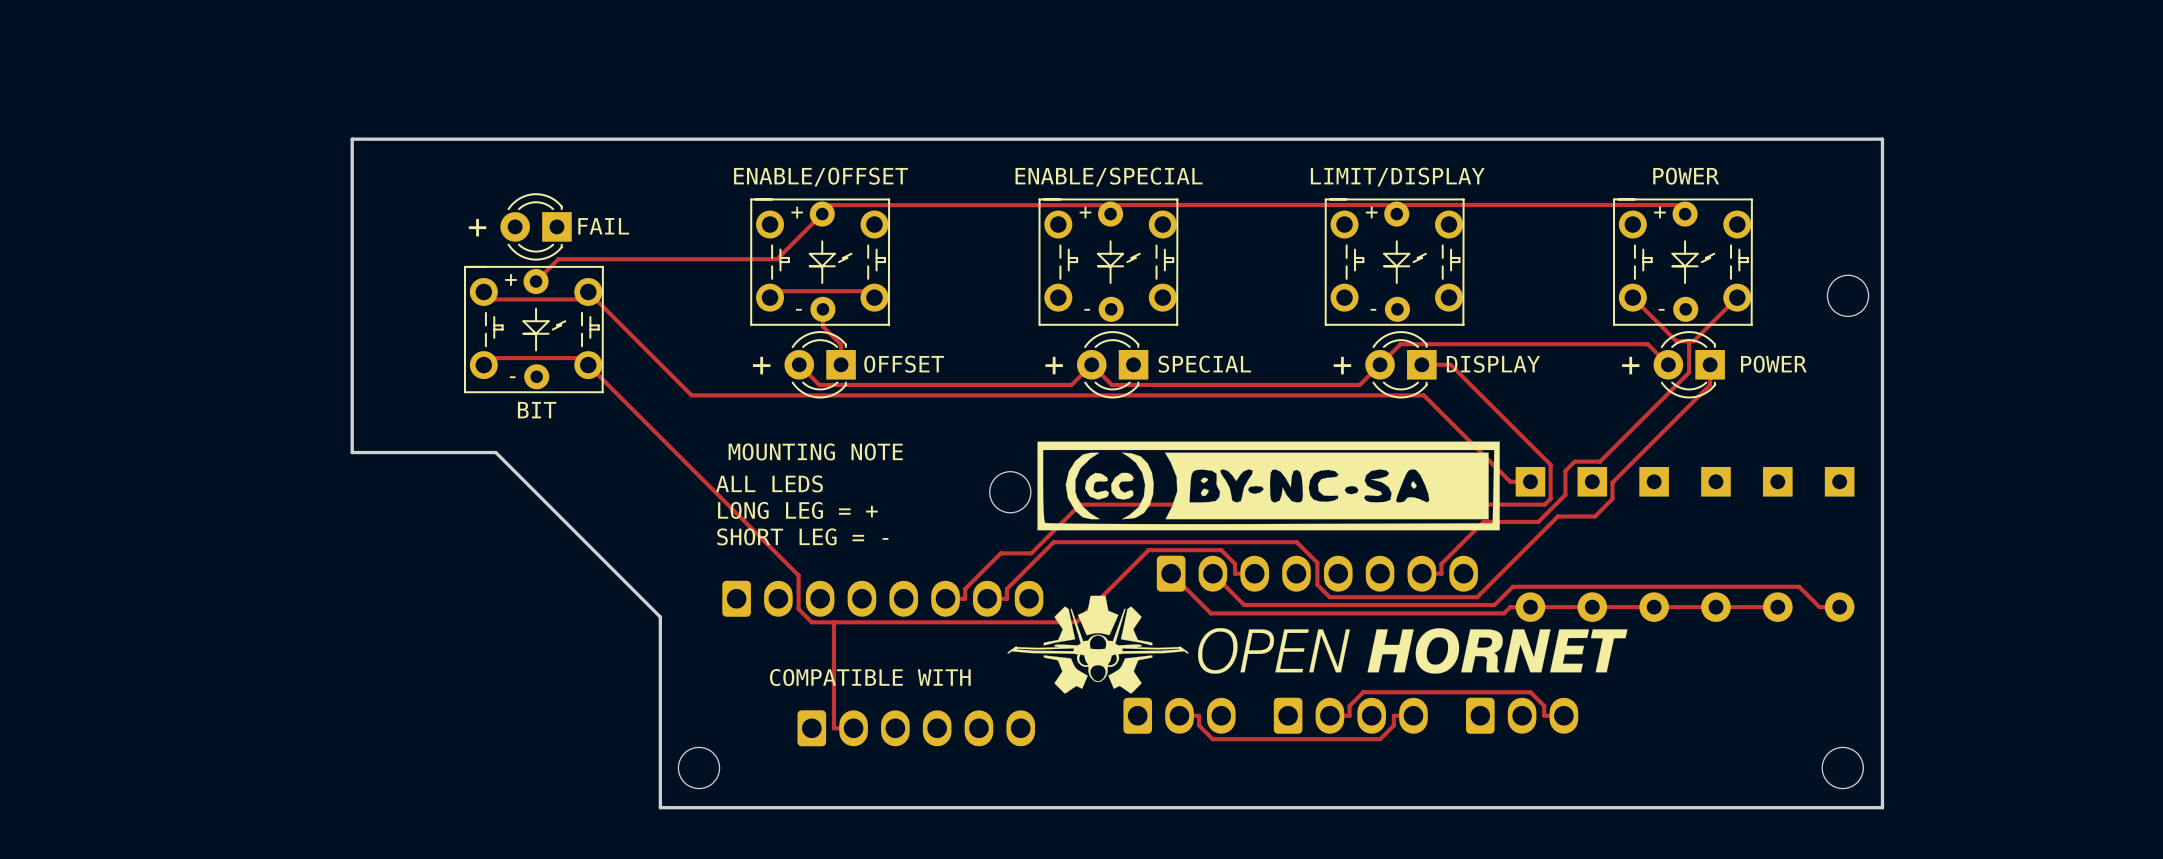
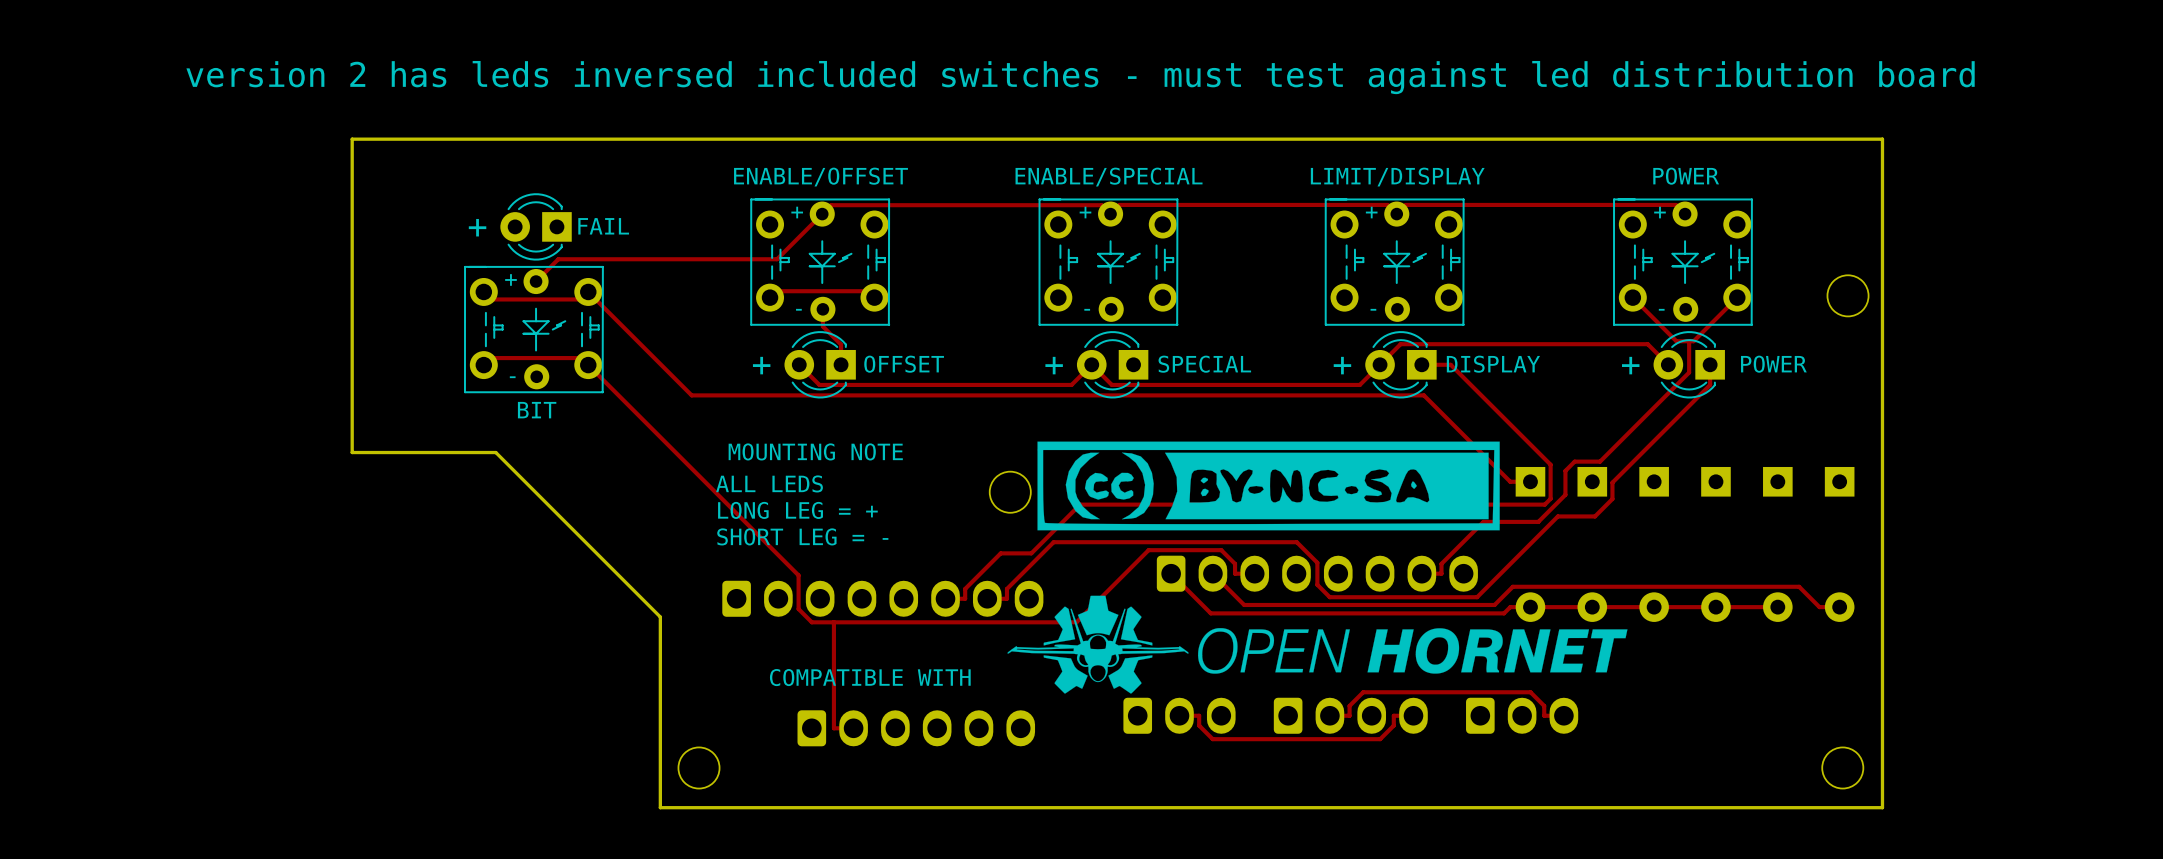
text: none -> version 2 has leds inversed included switches - must test against led distribution board (1080, 77)

